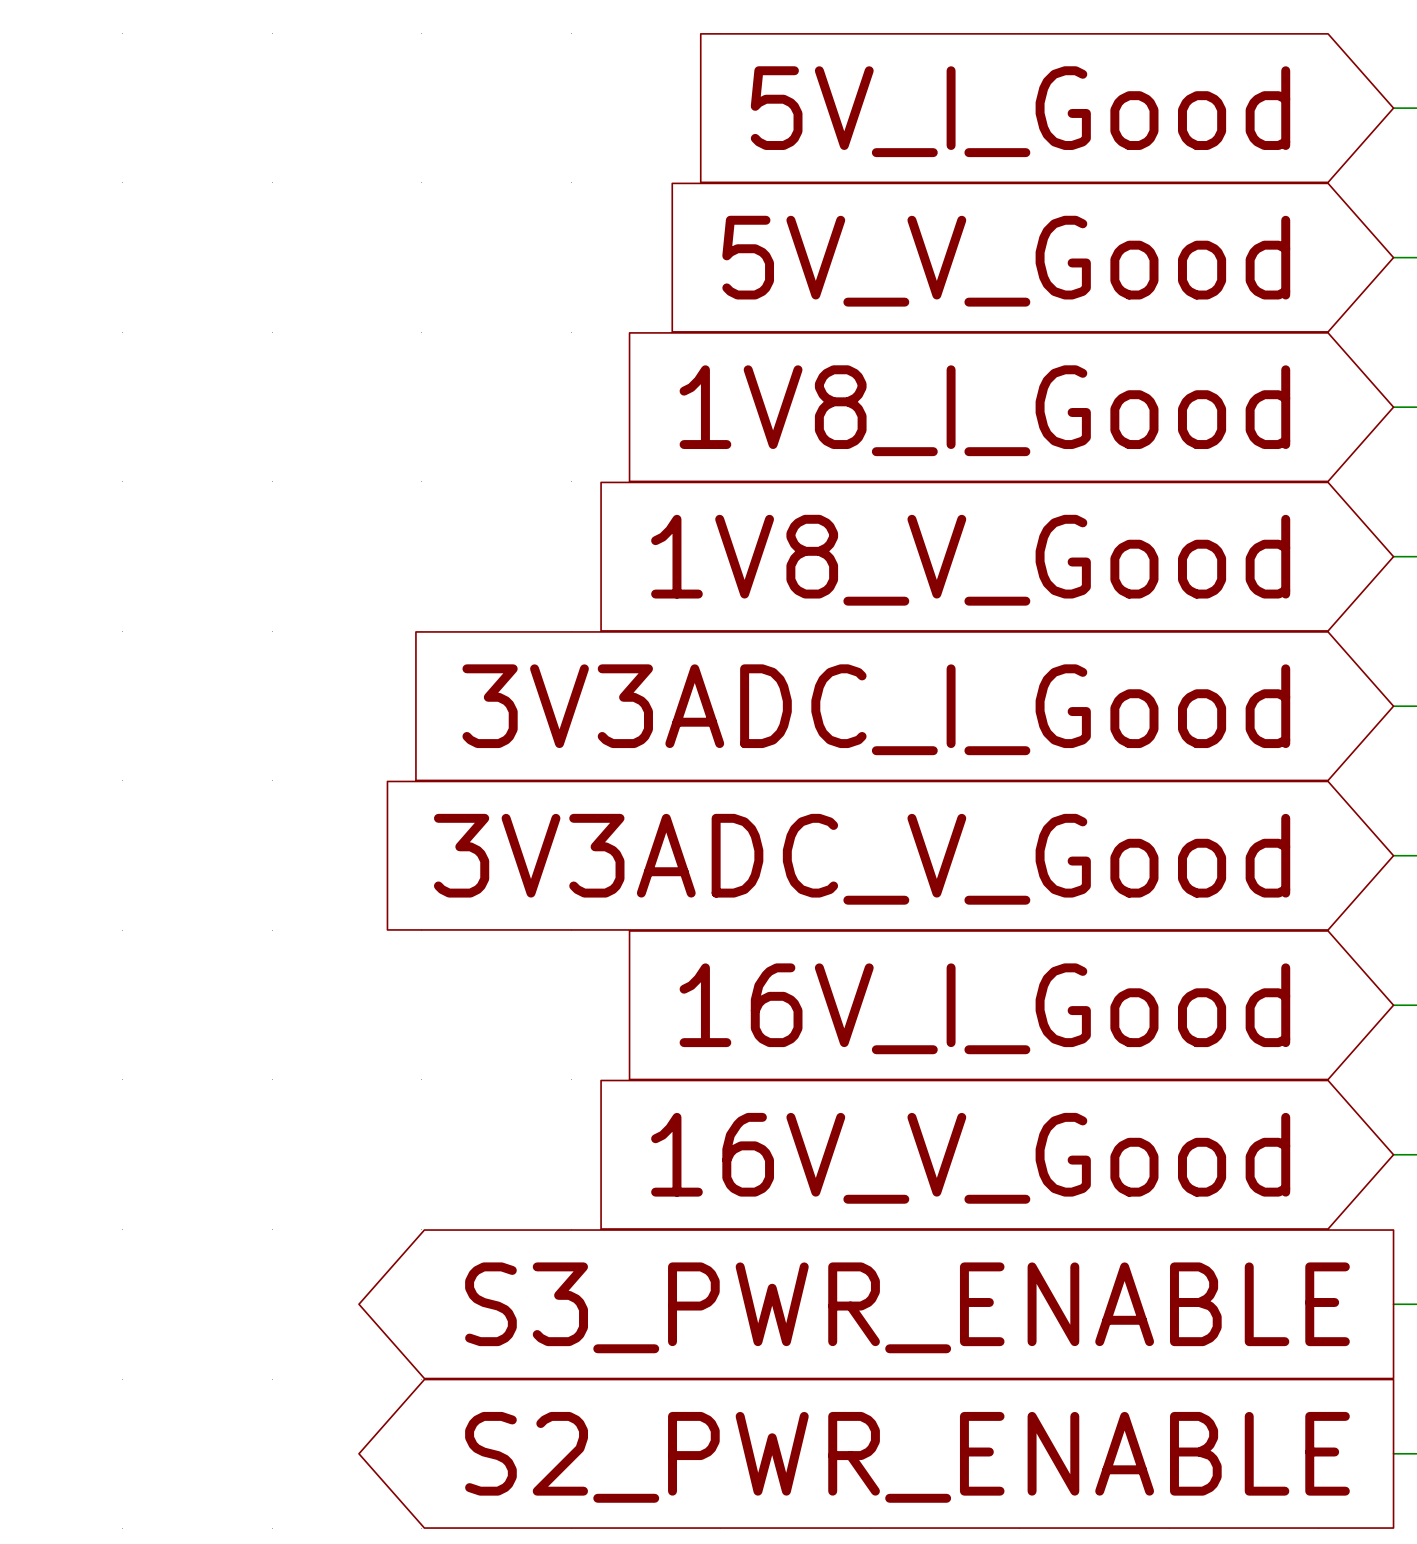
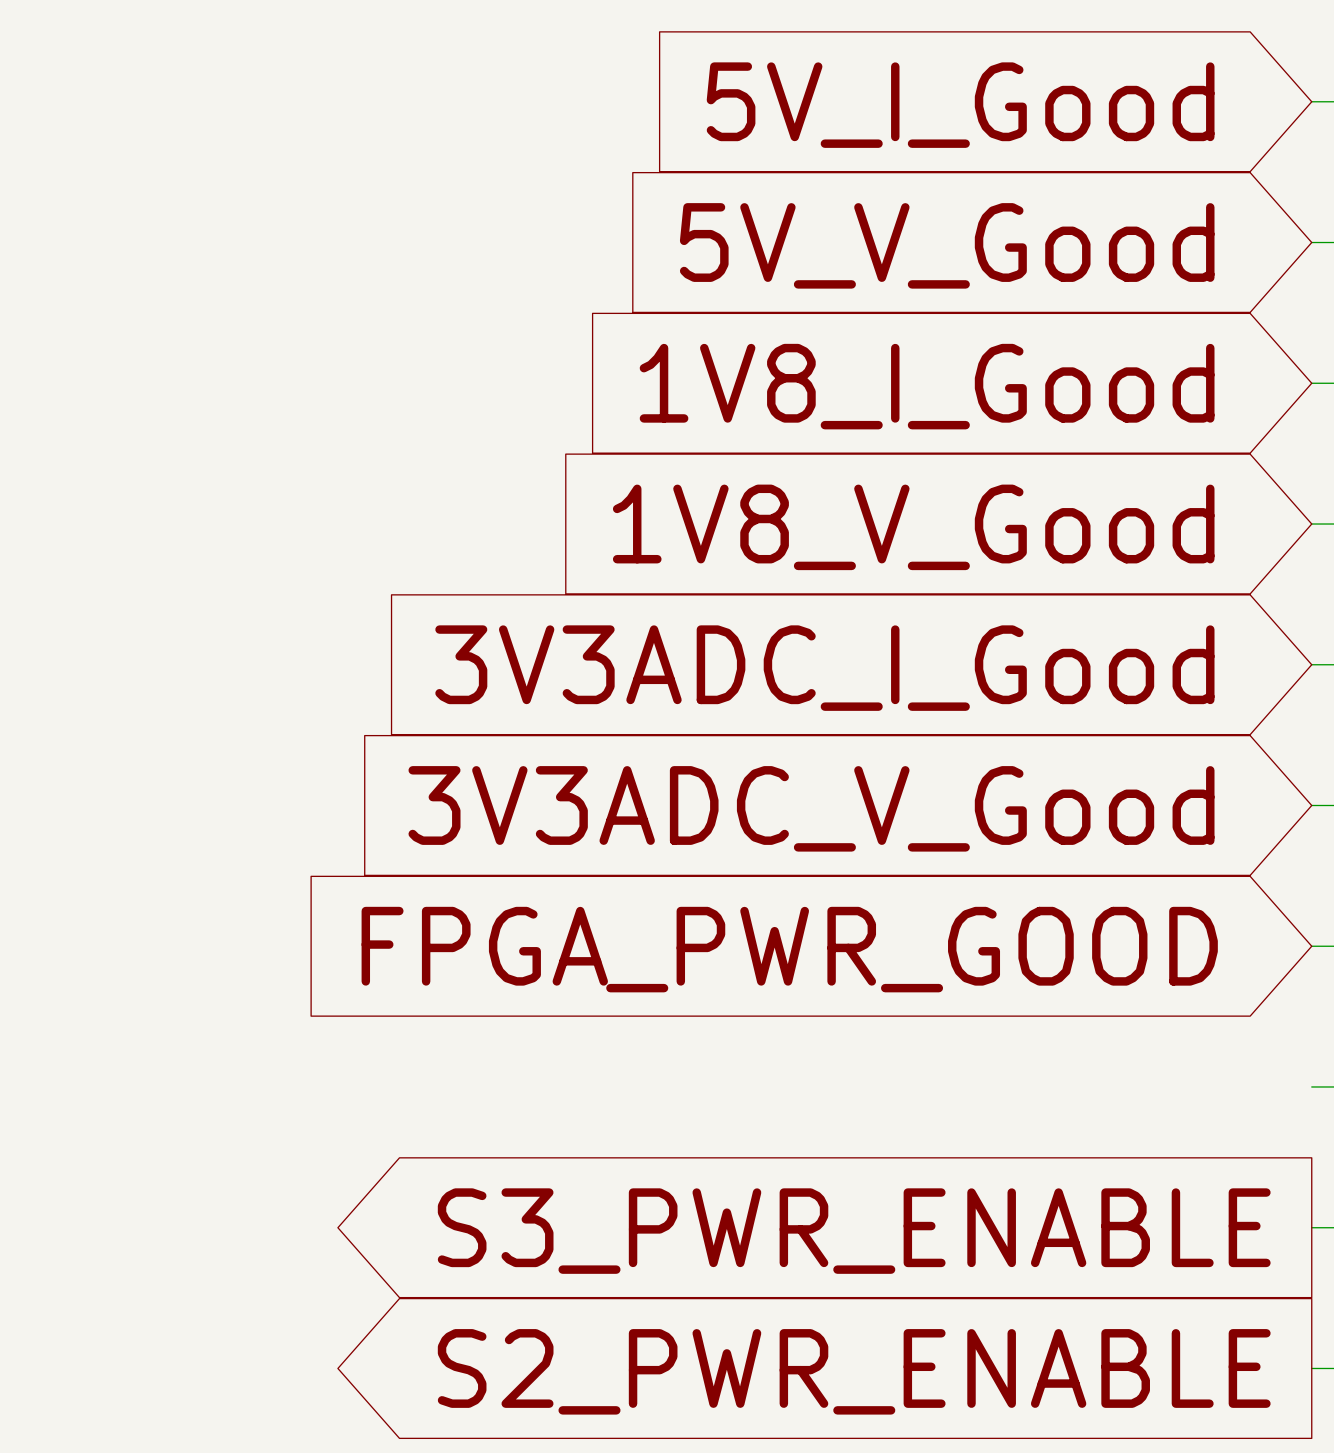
global label: 16V_I_Good (984, 1008) -> FPGA_PWR_GOOD (789, 949)
global label: 16V_V_Good (970, 1158) -> none

